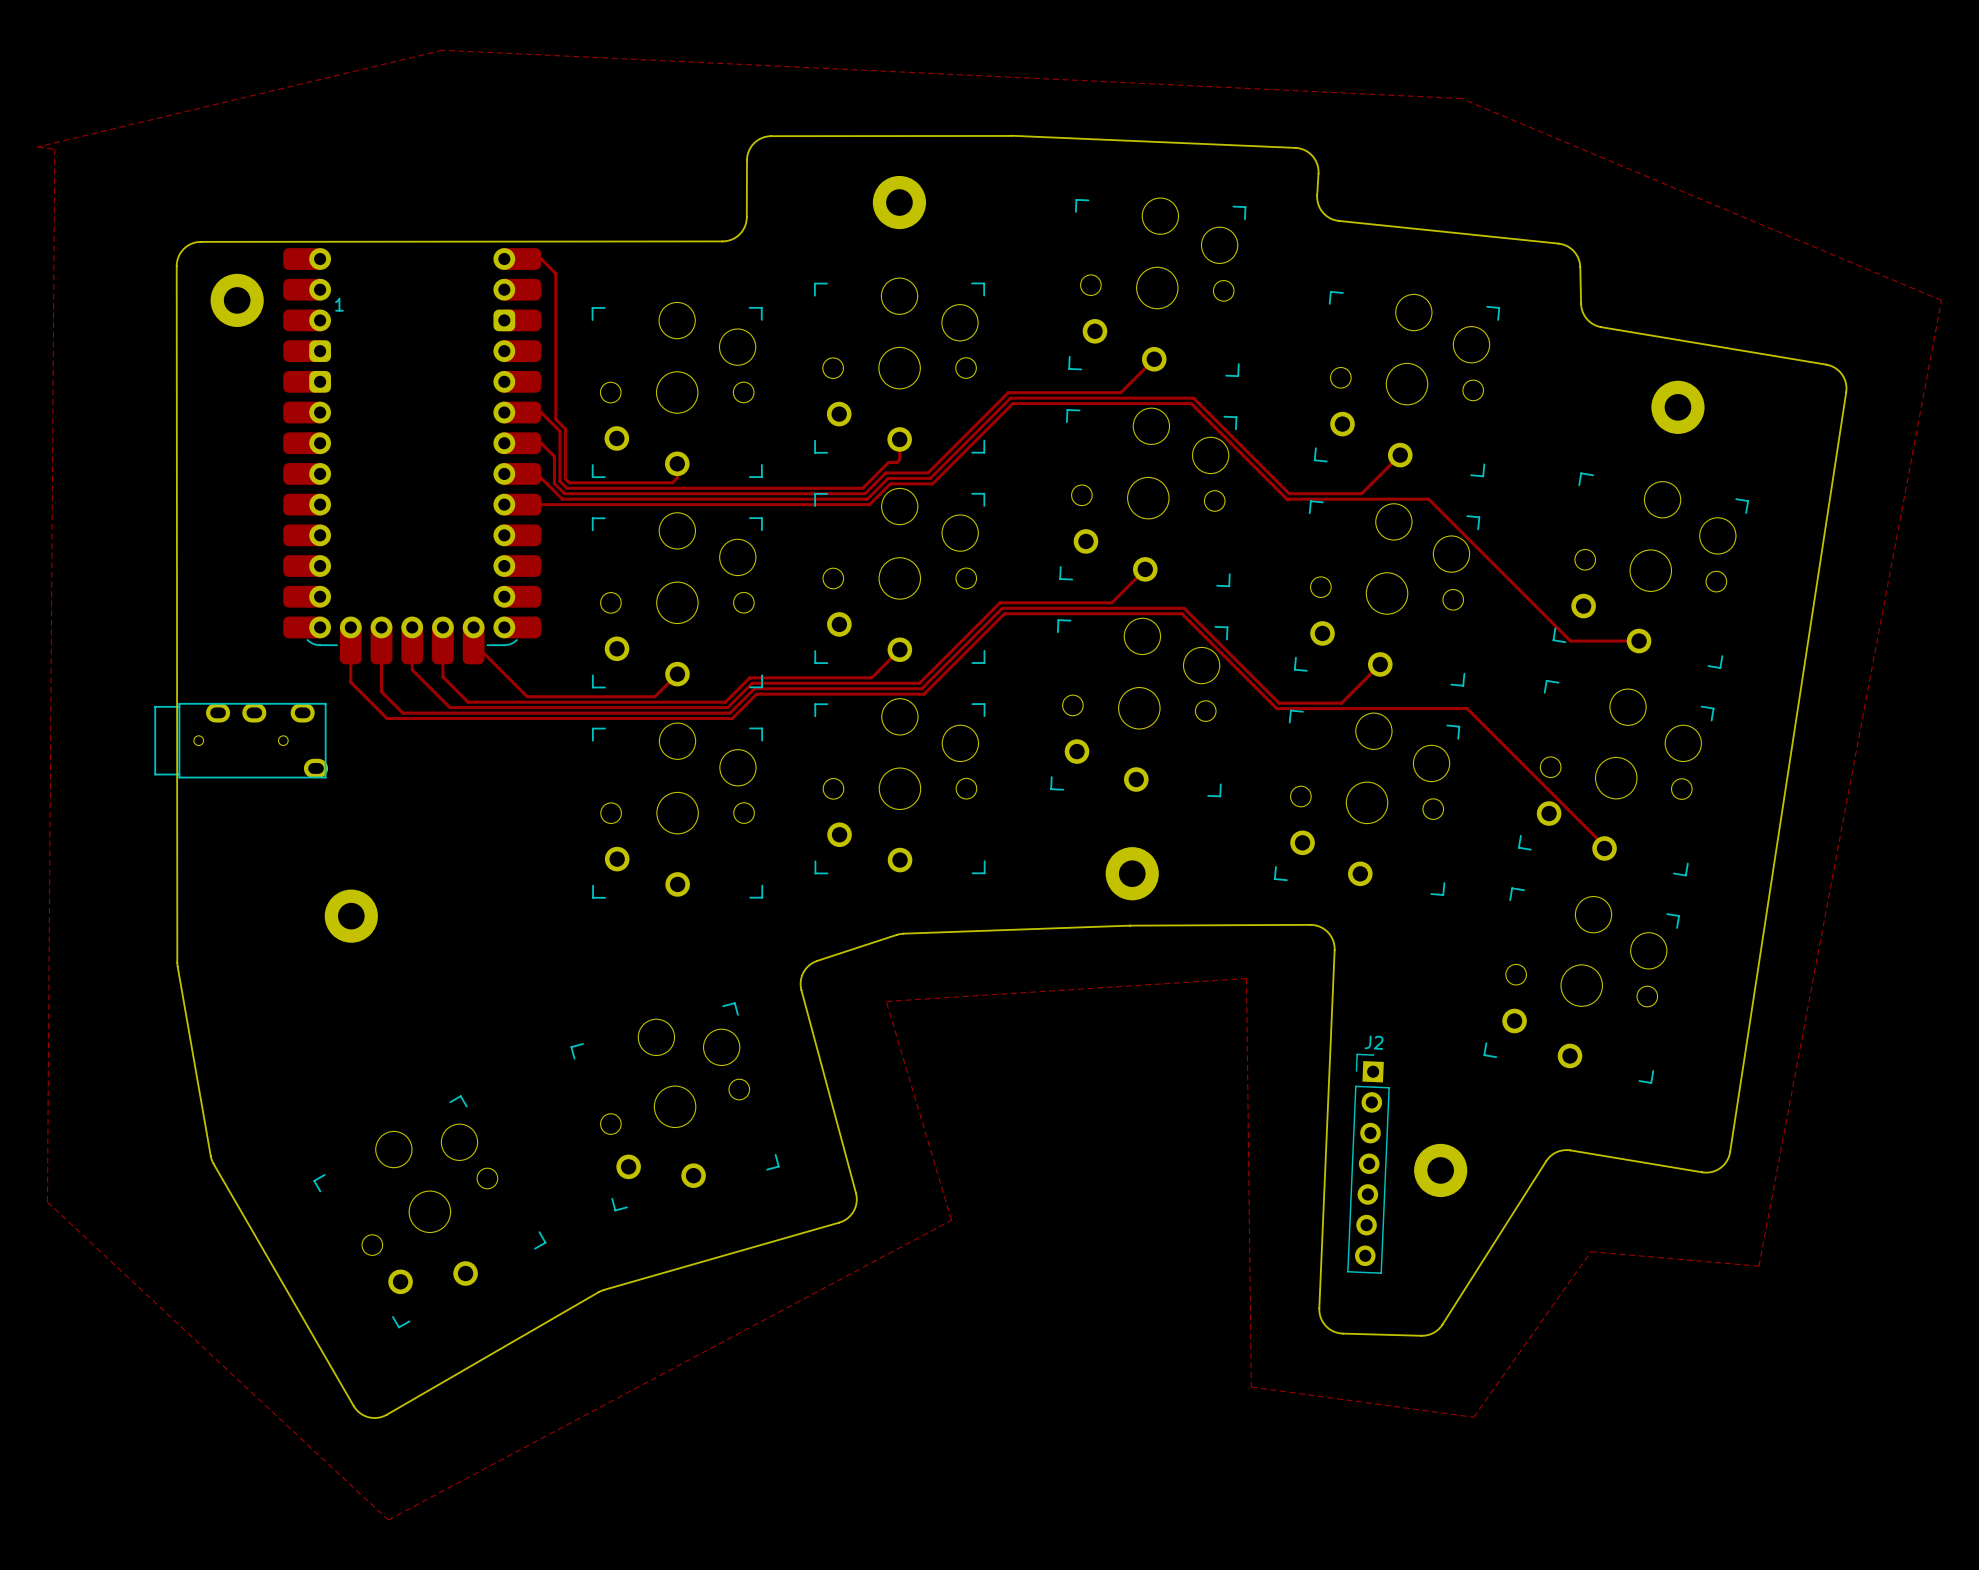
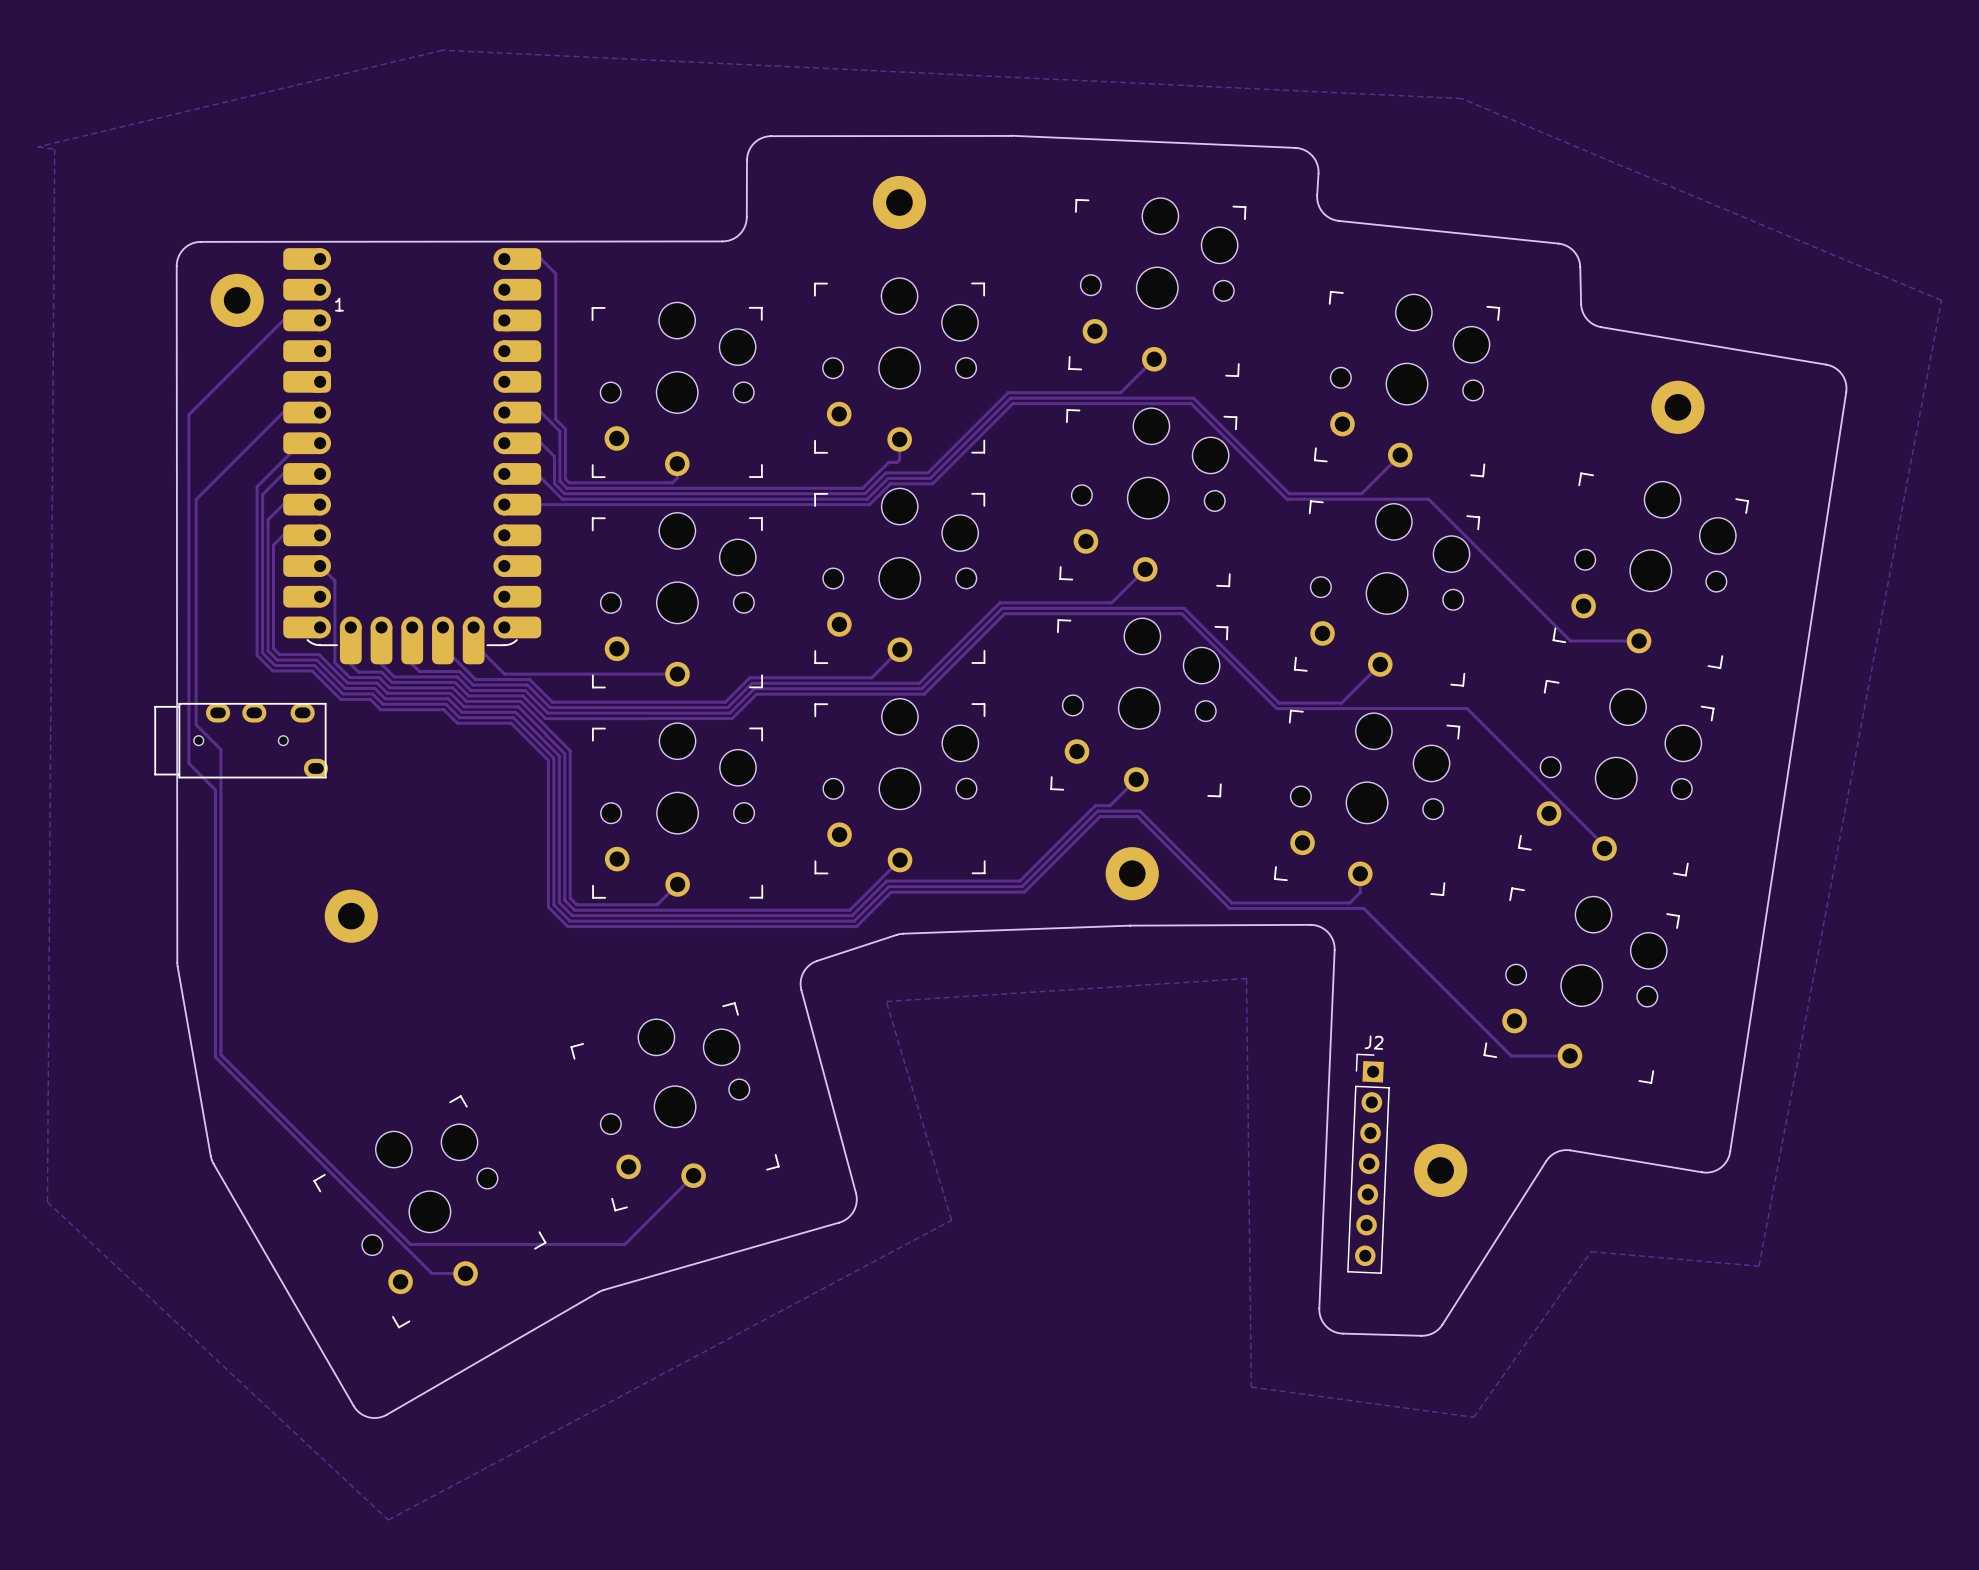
track: none -> (304, 320) (283, 320) (188, 414) (188, 763) (215, 789) (215, 1057) (431, 1273) (465, 1273)
track: none -> (304, 412) (283, 412) (196, 499) (196, 724) (220, 749) (220, 1054) (410, 1244) (624, 1244) (693, 1175)
track: none -> (304, 443) (300, 443) (257, 486) (257, 655) (272, 670) (312, 670) (340, 699) (370, 699) (380, 709) (443, 709) (457, 723) (511, 723) (548, 760) (548, 907) (567, 926) (856, 926) (891, 892) (1024, 892) (1099, 816) (1137, 816) (1229, 908) (1363, 908) (1511, 1055) (1570, 1055)
track: none -> (304, 473) (283, 473) (262, 494) (262, 653) (275, 665) (314, 665) (343, 693) (372, 693) (382, 704) (446, 704) (459, 717) (513, 717) (553, 758) (553, 904) (570, 921) (854, 921) (888, 886) (1022, 886) (1097, 811) (1140, 811) (1231, 902) (1349, 902) (1360, 892) (1360, 873)
track: none -> (304, 504) (283, 504) (268, 519) (268, 650) (277, 660) (316, 660) (345, 688) (374, 688) (385, 698) (448, 698) (461, 712) (515, 712) (559, 755) (559, 902) (572, 915) (852, 915) (886, 881) (1020, 881) (1095, 805) (1110, 805) (1136, 779)
track: none -> (304, 535) (283, 535) (273, 545) (273, 648) (279, 654) (319, 654) (347, 683) (377, 683) (387, 693) (450, 693) (464, 706) (518, 706) (564, 753) (564, 900) (574, 910) (849, 910) (900, 860)
track: none -> (320, 566) (334, 580) (334, 662) (349, 677) (379, 677) (389, 687) (452, 687) (466, 701) (520, 701) (570, 750) (570, 898) (576, 904) (657, 904) (677, 884)
track: (442, 646) (442, 677) (468, 702) (552, 702) -> (442, 646) (475, 679) (529, 679) (552, 702)
track: (350, 664) (350, 682) (386, 718) (650, 718) -> (350, 664) (358, 672) (381, 672) (391, 682) (455, 682) (468, 695) (522, 695) (545, 718) (650, 718)
track: (381, 664) (381, 691) (402, 713) (547, 713) -> (381, 664) (394, 676) (457, 676) (470, 690) (525, 690) (547, 713)
track: (412, 664) (412, 669) (449, 707) (550, 707) -> (412, 664) (419, 671) (459, 671) (473, 685) (527, 685) (550, 707)
track: (504, 674) (527, 696) (654, 696) (677, 674) -> (504, 674) (677, 674)

